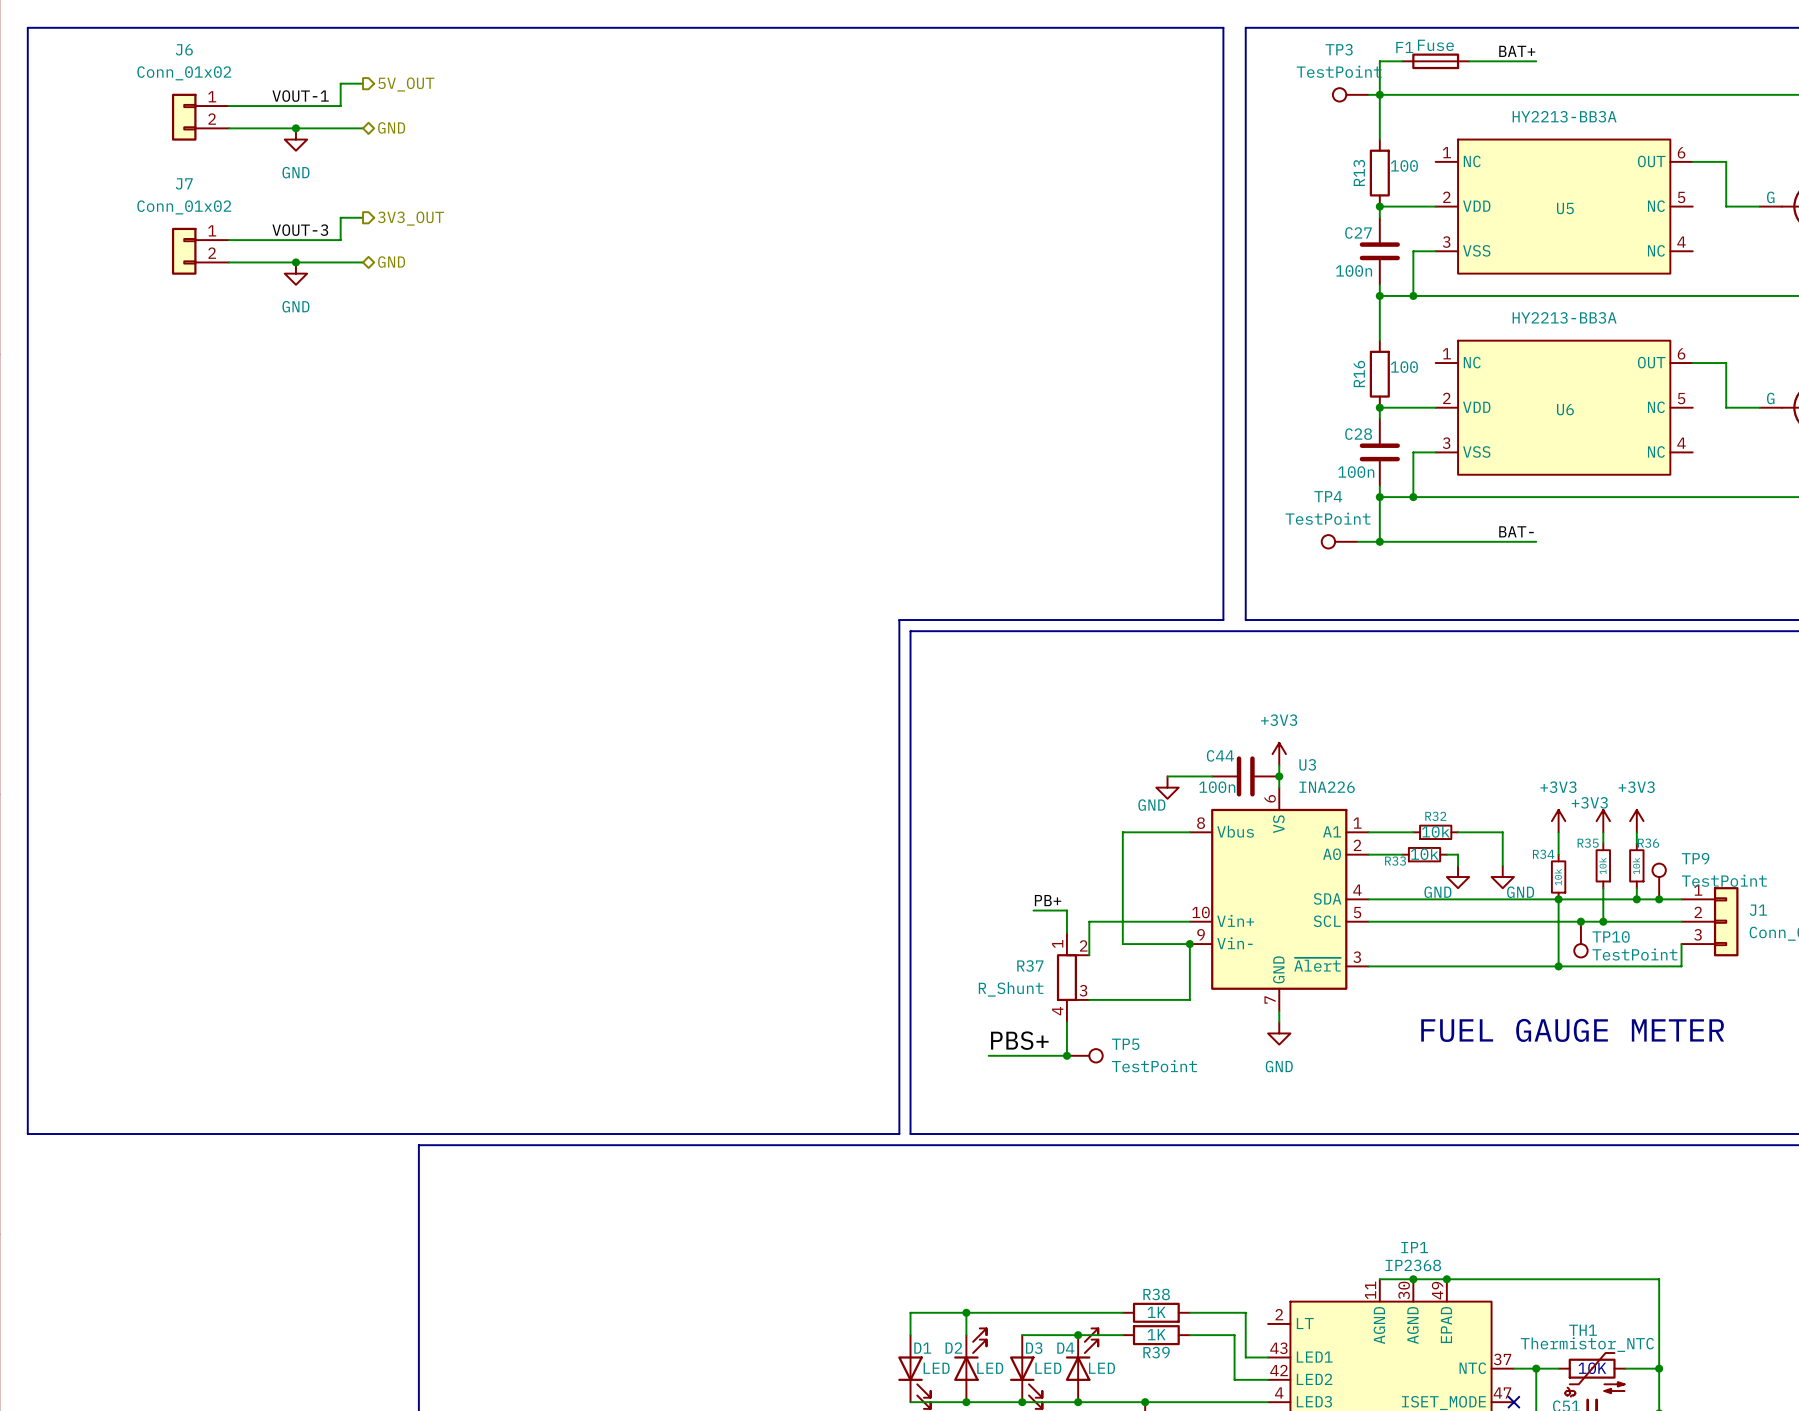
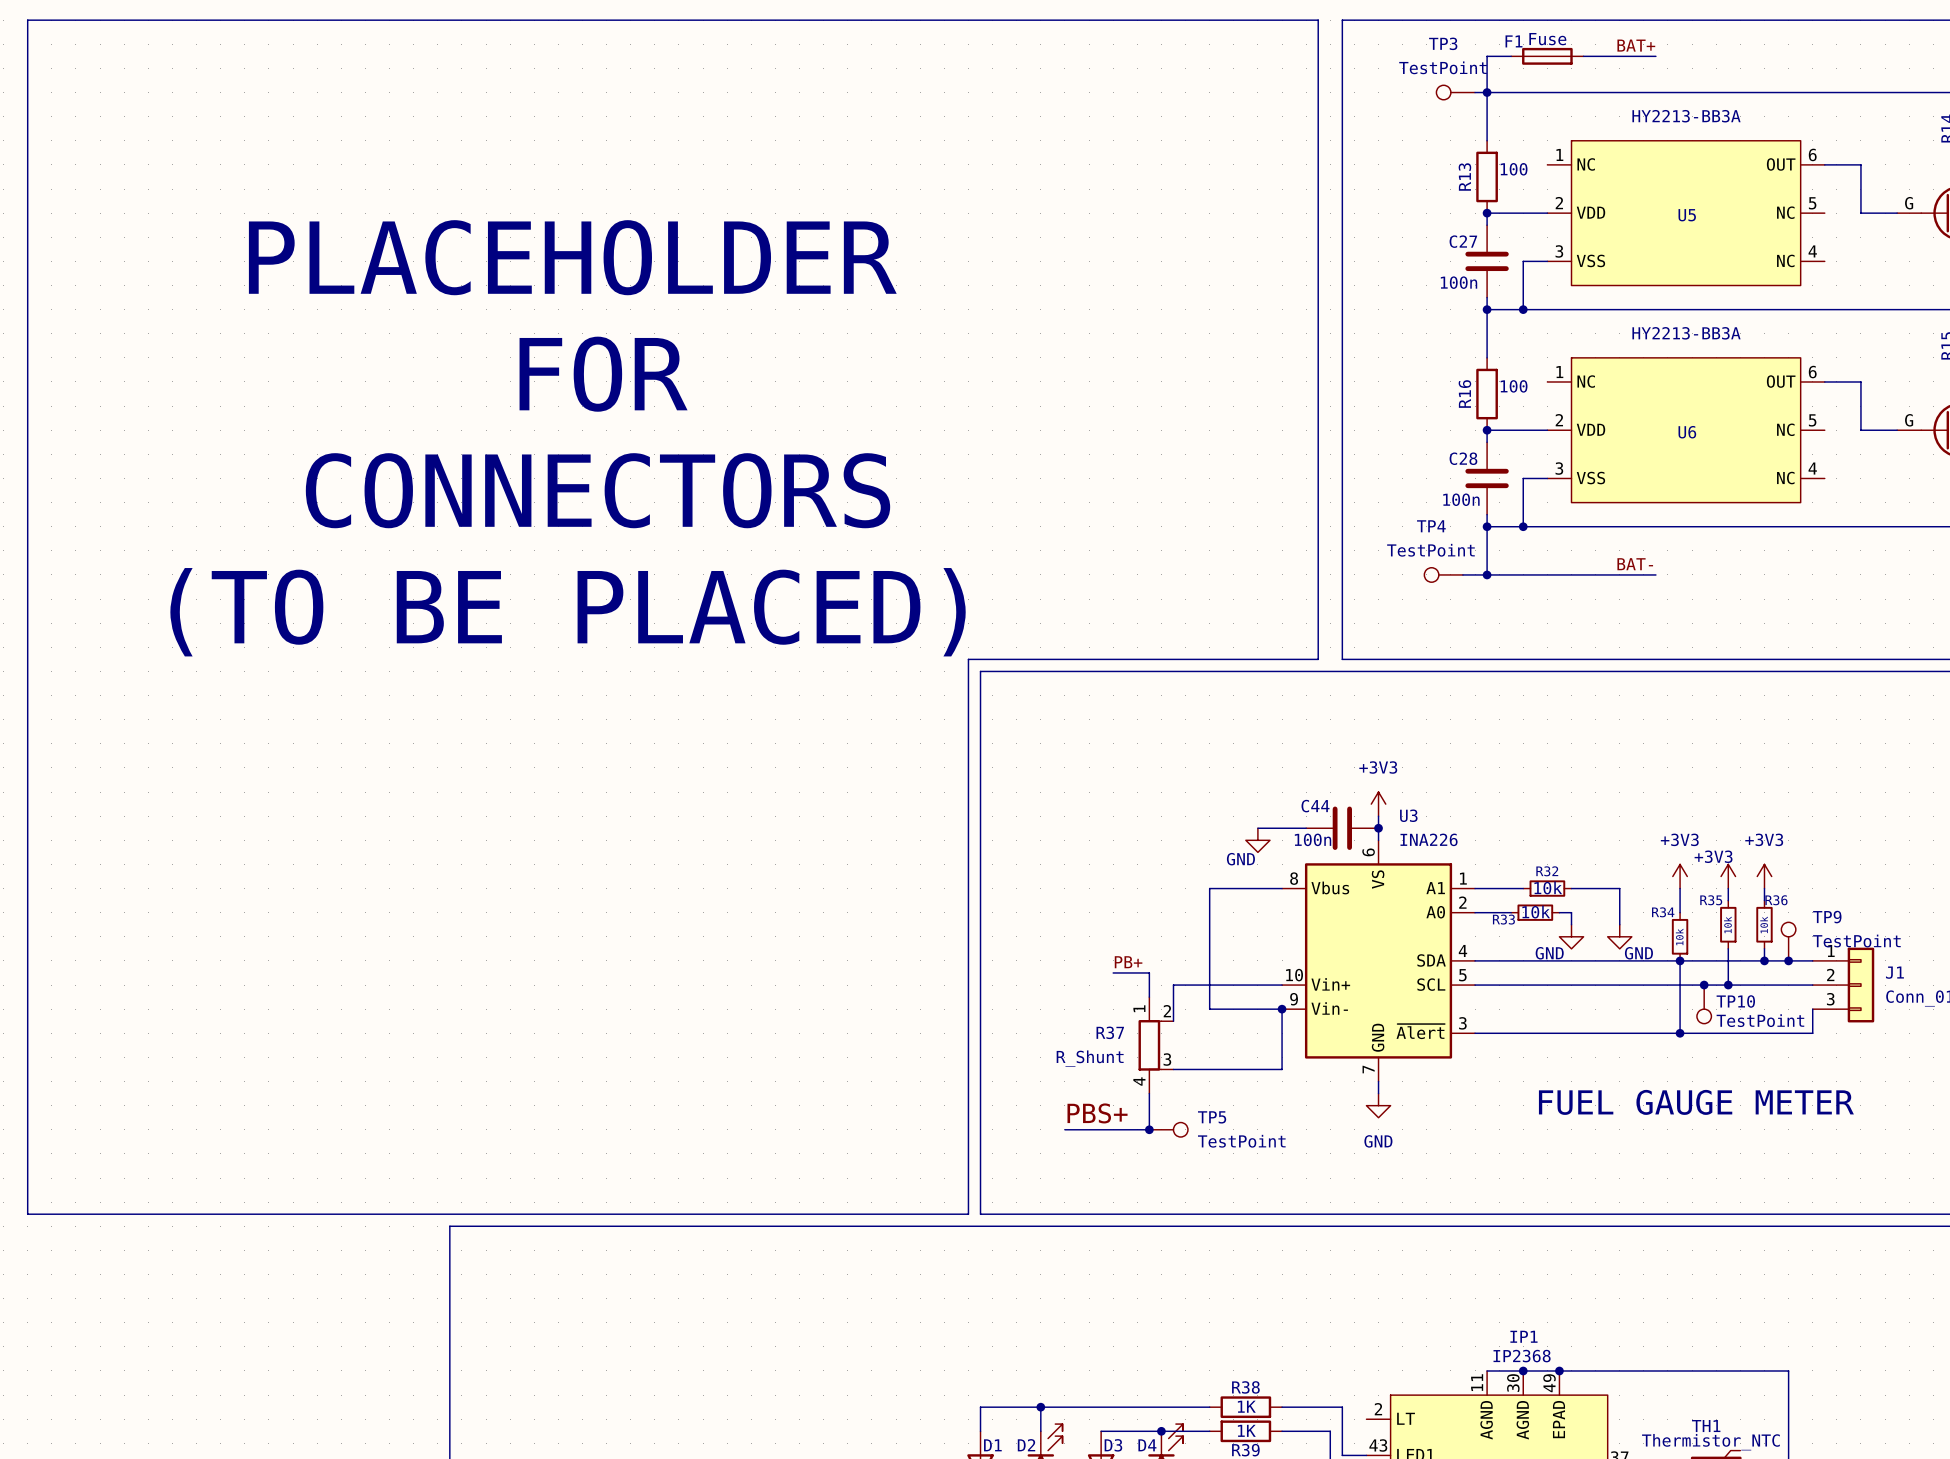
wire: (363, 83) (340, 83) (340, 106) (228, 106) -> none
hierarchical label: 5V_OUT (406, 84) -> none
label: VOUT-1 (300, 96) -> none
J6: Conn_01x02 (200, 117) -> none
hierarchical label: GND (391, 127) -> none
wire: (228, 128) (363, 128) -> none
junction: (295, 128) -> none
power symbol: GND (295, 139) -> none
wire: (363, 217) (340, 217) (340, 240) (228, 240) -> none
hierarchical label: 3V3_OUT (411, 218) -> none
label: VOUT-3 (300, 230) -> none
text: none -> PLACEHOLDER (572, 257)
J7: Conn_01x02 (200, 251) -> none
wire: (228, 262) (363, 262) -> none
junction: (295, 262) -> none
hierarchical label: GND (391, 262) -> none
power symbol: GND (295, 273) -> none
text: none -> FOR (603, 374)
text: none -> CONNECTORS (598, 490)
text: none -> (TO BE PLACED) (568, 612)

